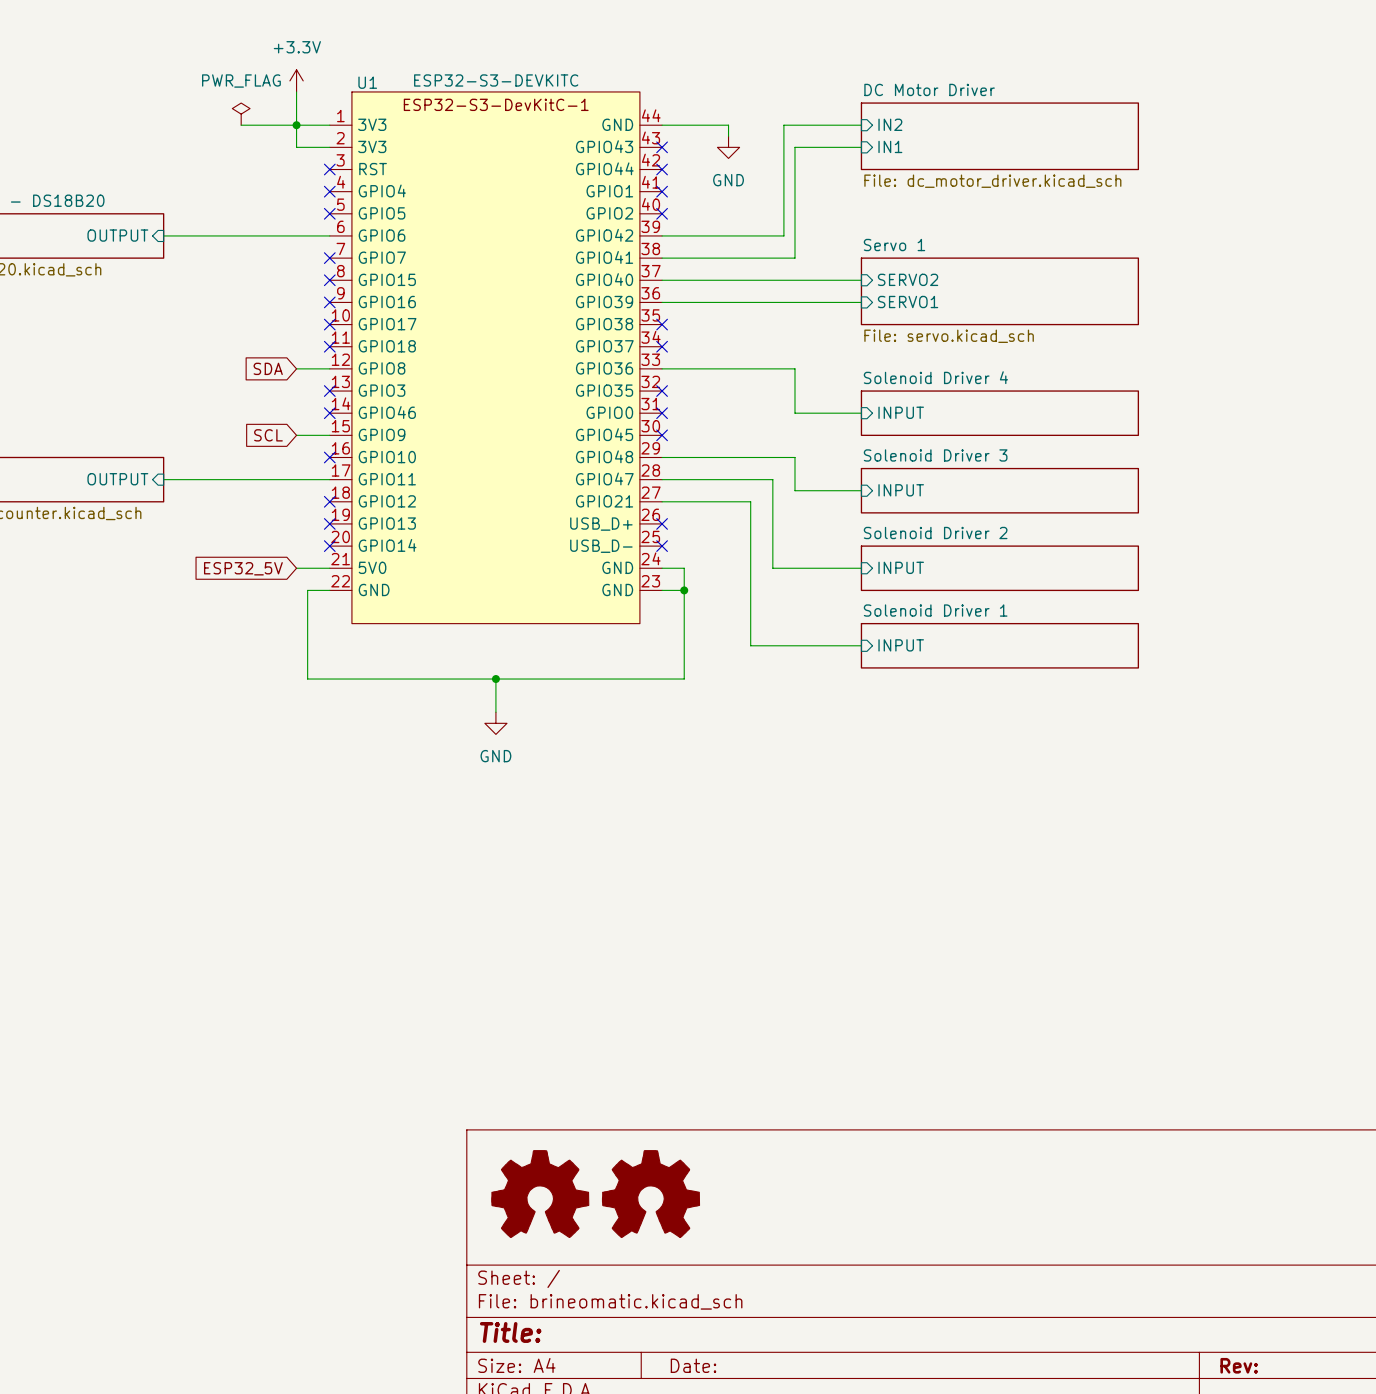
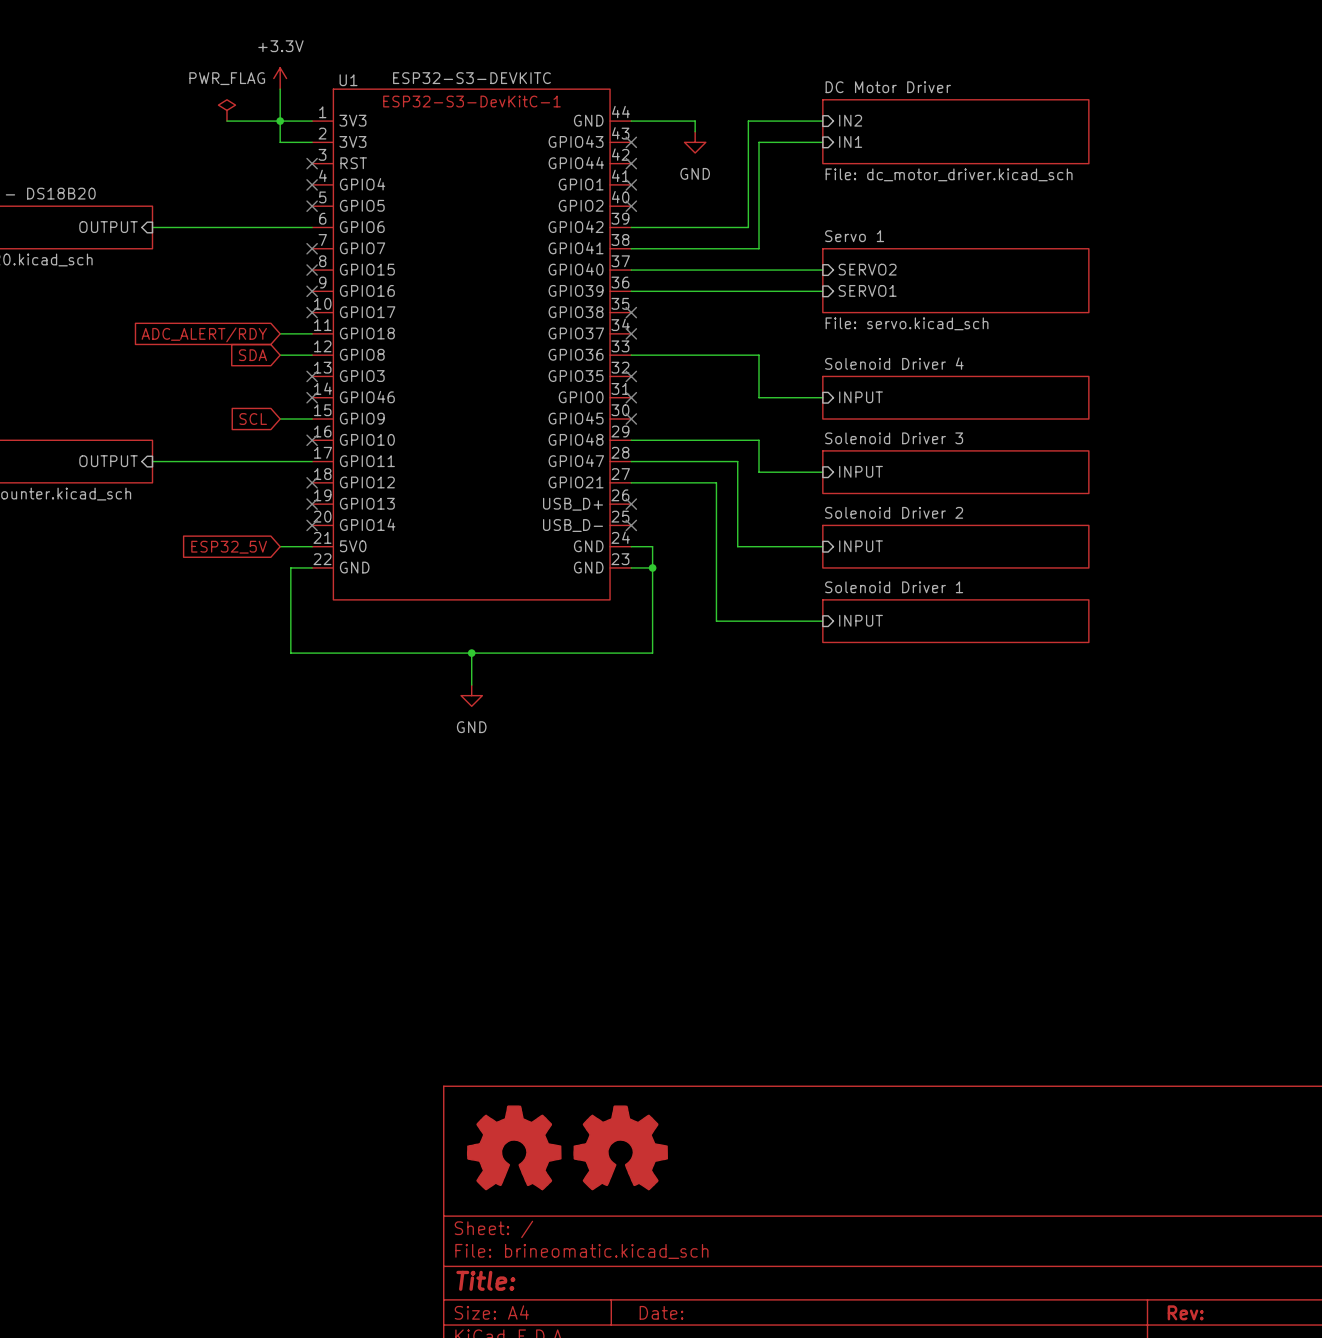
wire: none -> (280, 333) (312, 333)
no-connect mark: (329, 346) -> none
global label: none -> ADC_ALERT/RDY (204, 334)

